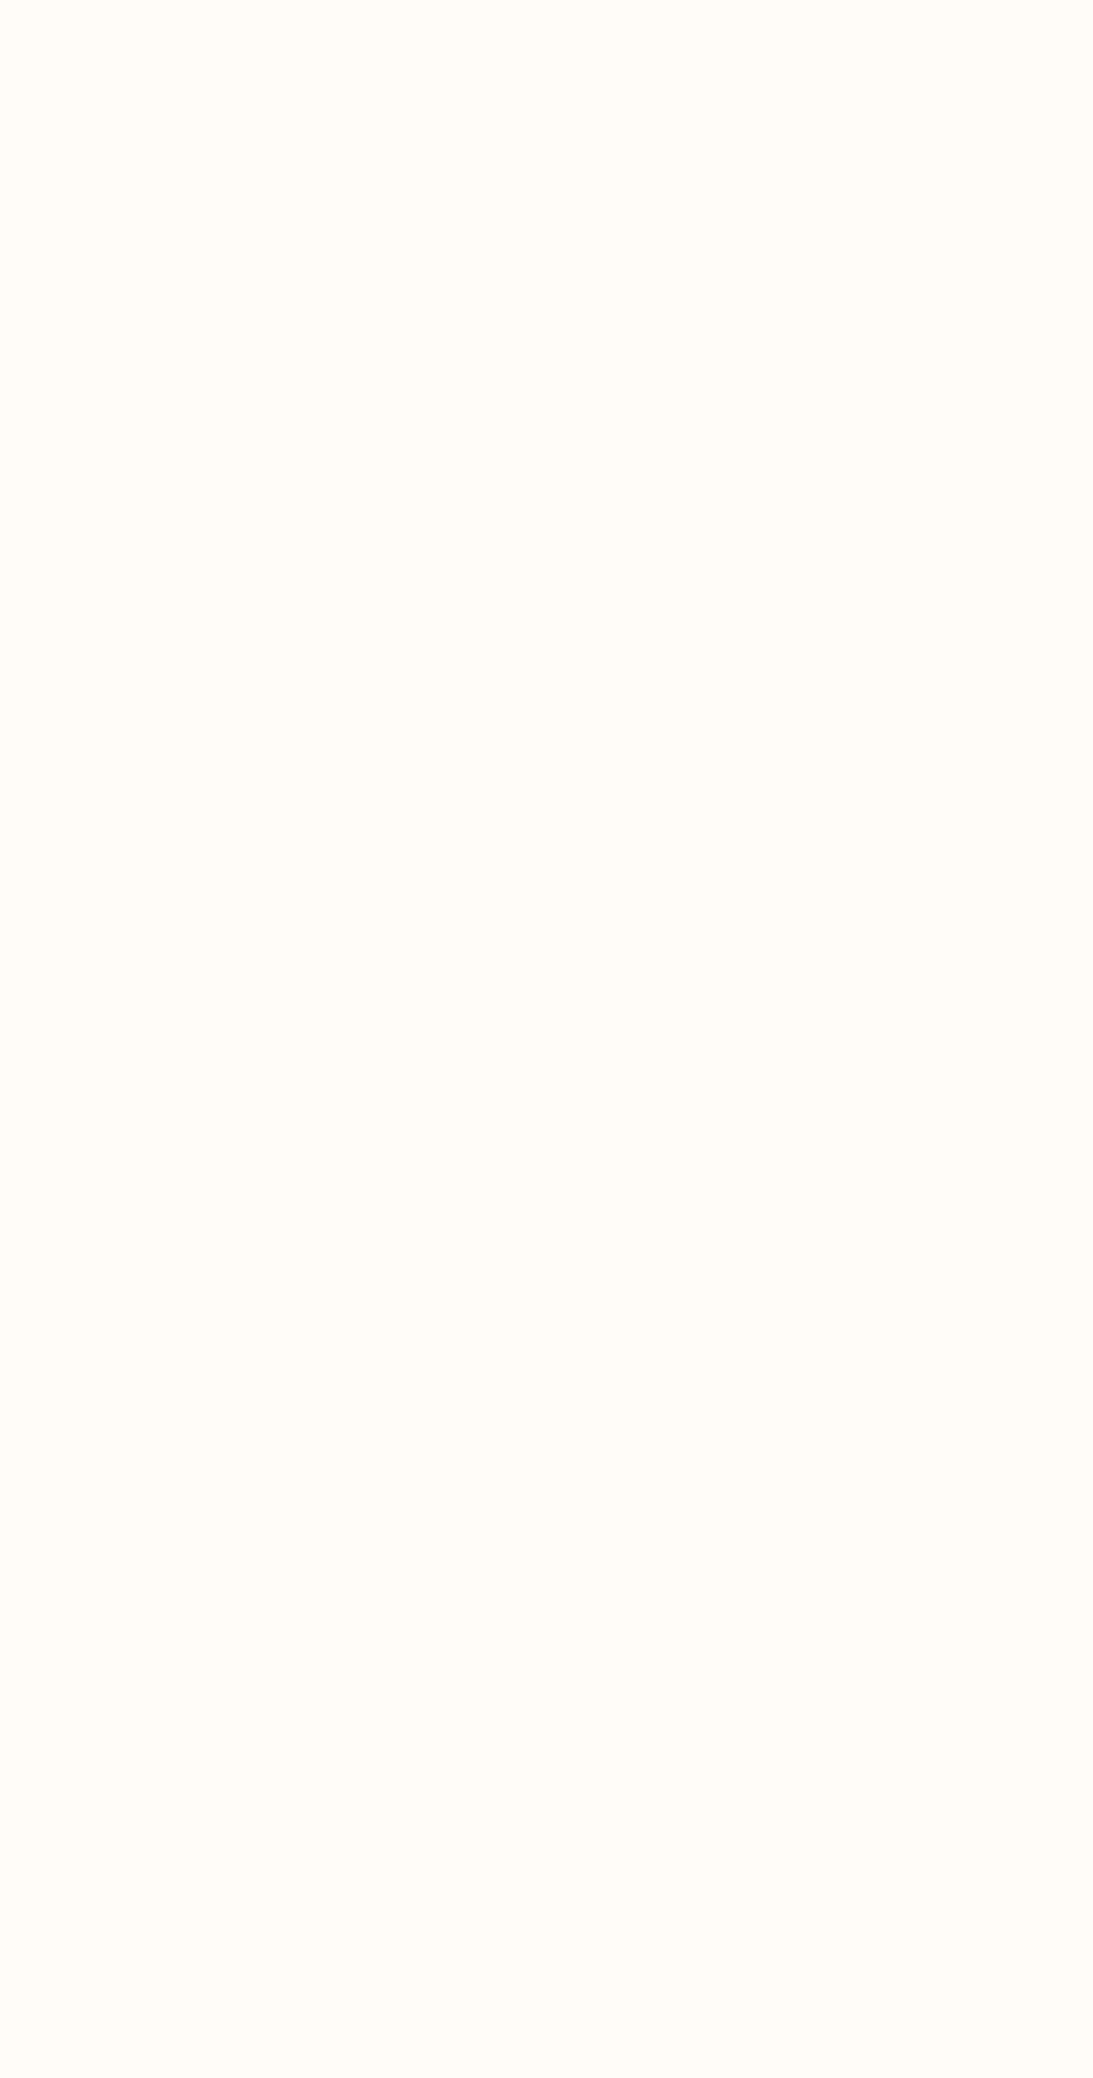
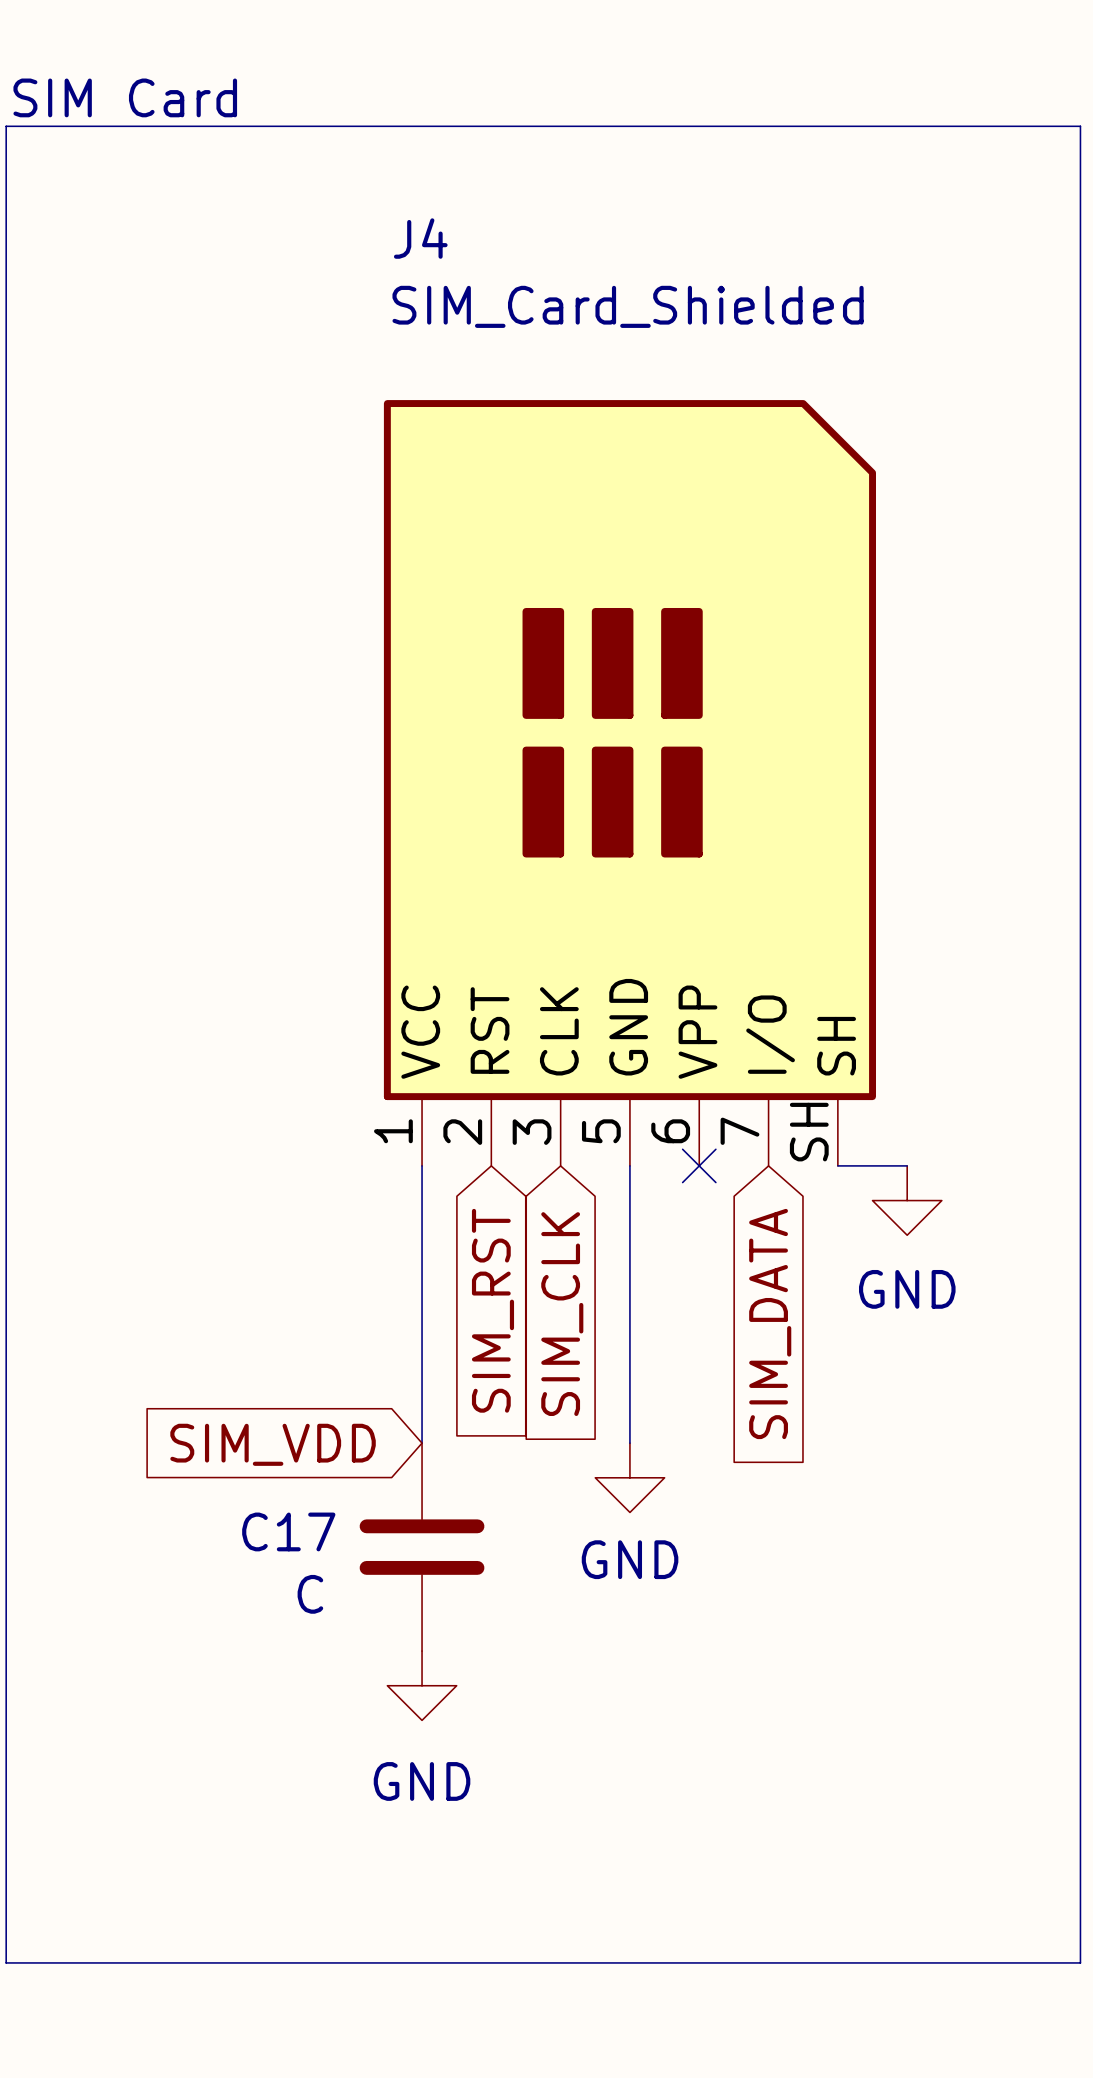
text: none -> SIM Card (125, 97)
line: none -> (6, 126) (6, 1962) (1080, 1962) (1080, 126) (6, 126)
J4: none -> SIM_Card_Shielded (629, 782)
wire: none -> (422, 1165) (422, 1443)
wire: none -> (629, 1165) (629, 1443)
no-connect mark: none -> (699, 1165)
wire: none -> (837, 1165) (907, 1165)
power symbol: none -> GND (907, 1200)
global label: none -> SIM_RST (492, 1310)
global label: none -> SIM_CLK (562, 1314)
global label: none -> SIM_DATA (770, 1323)
global label: none -> SIM_VDD (273, 1444)
power symbol: none -> GND (629, 1477)
C17: none -> C (422, 1547)
power symbol: none -> GND (422, 1685)

